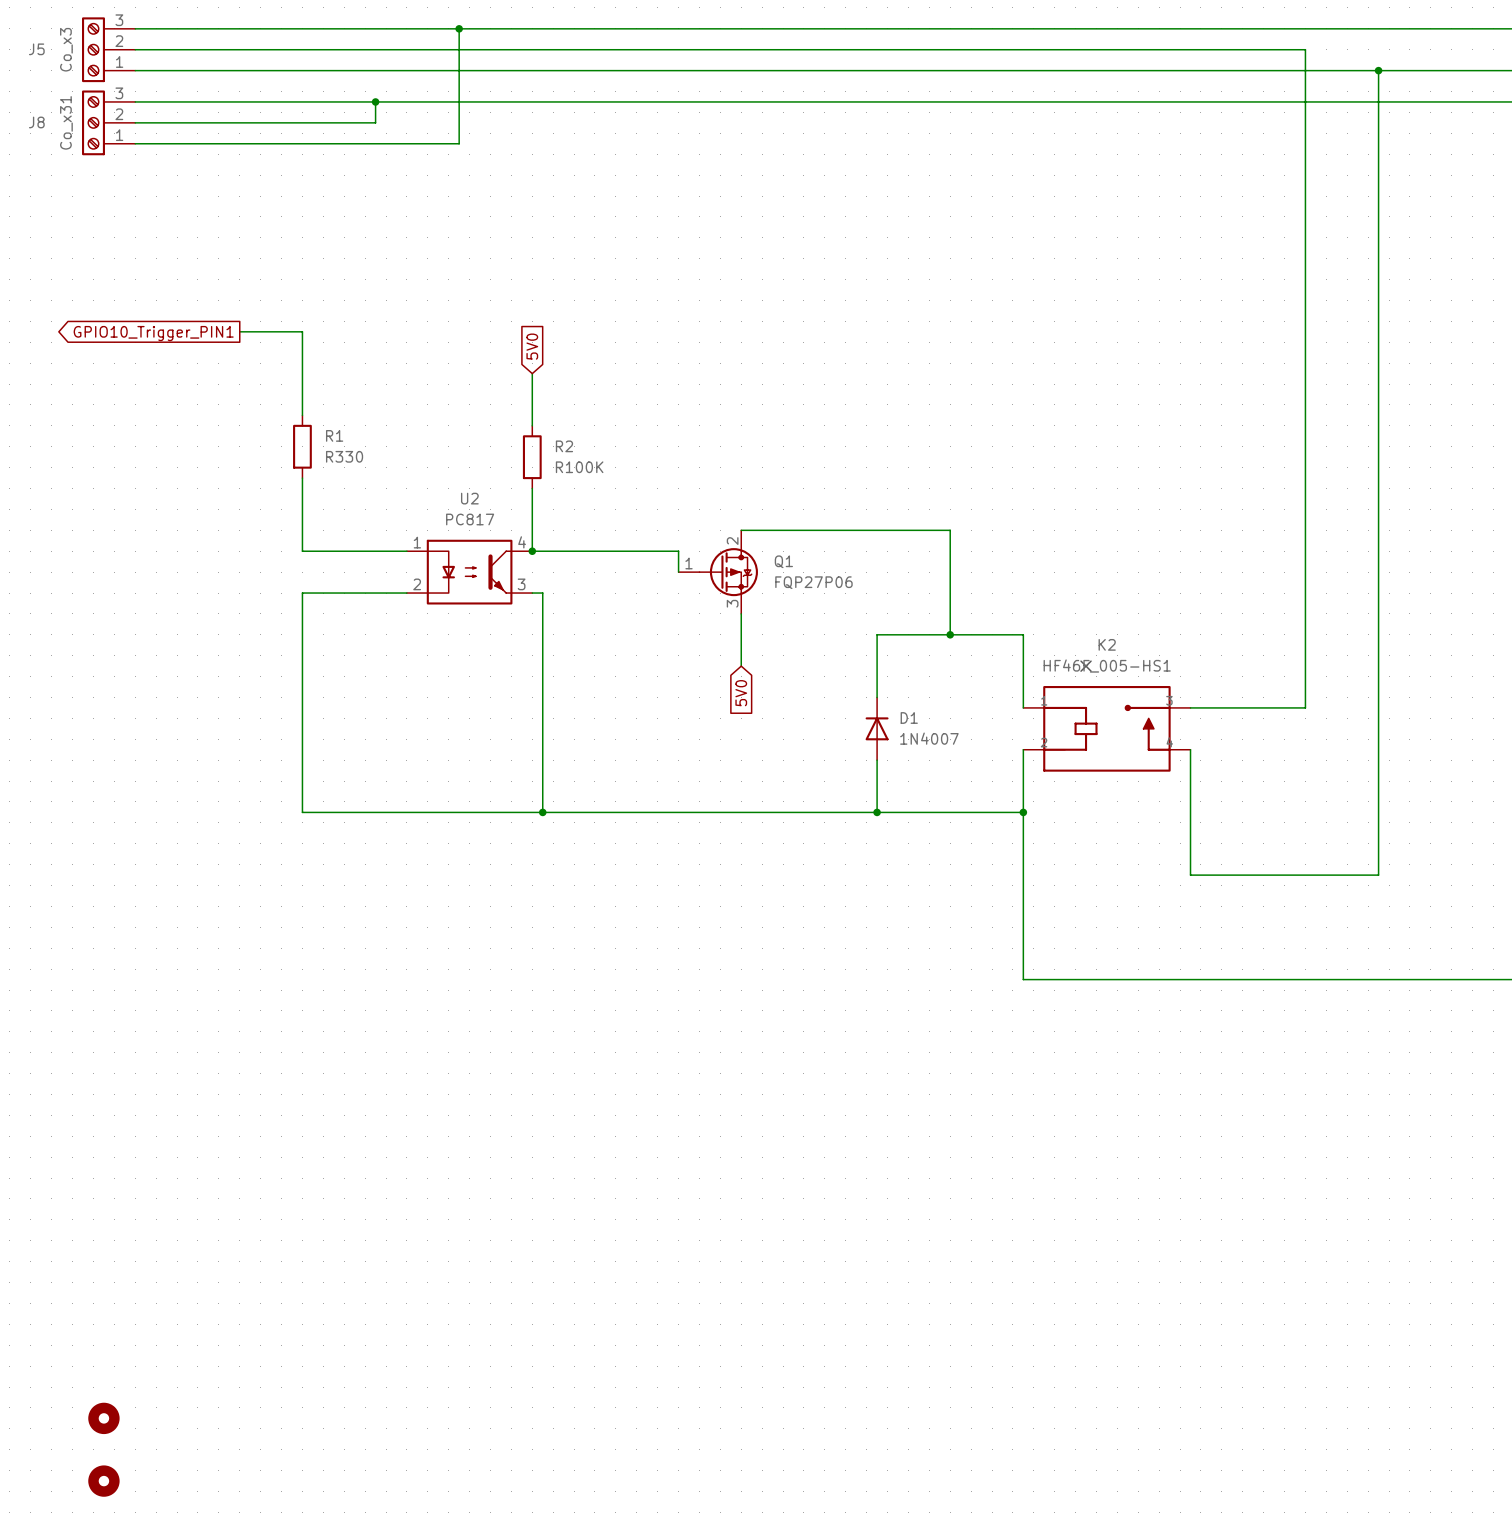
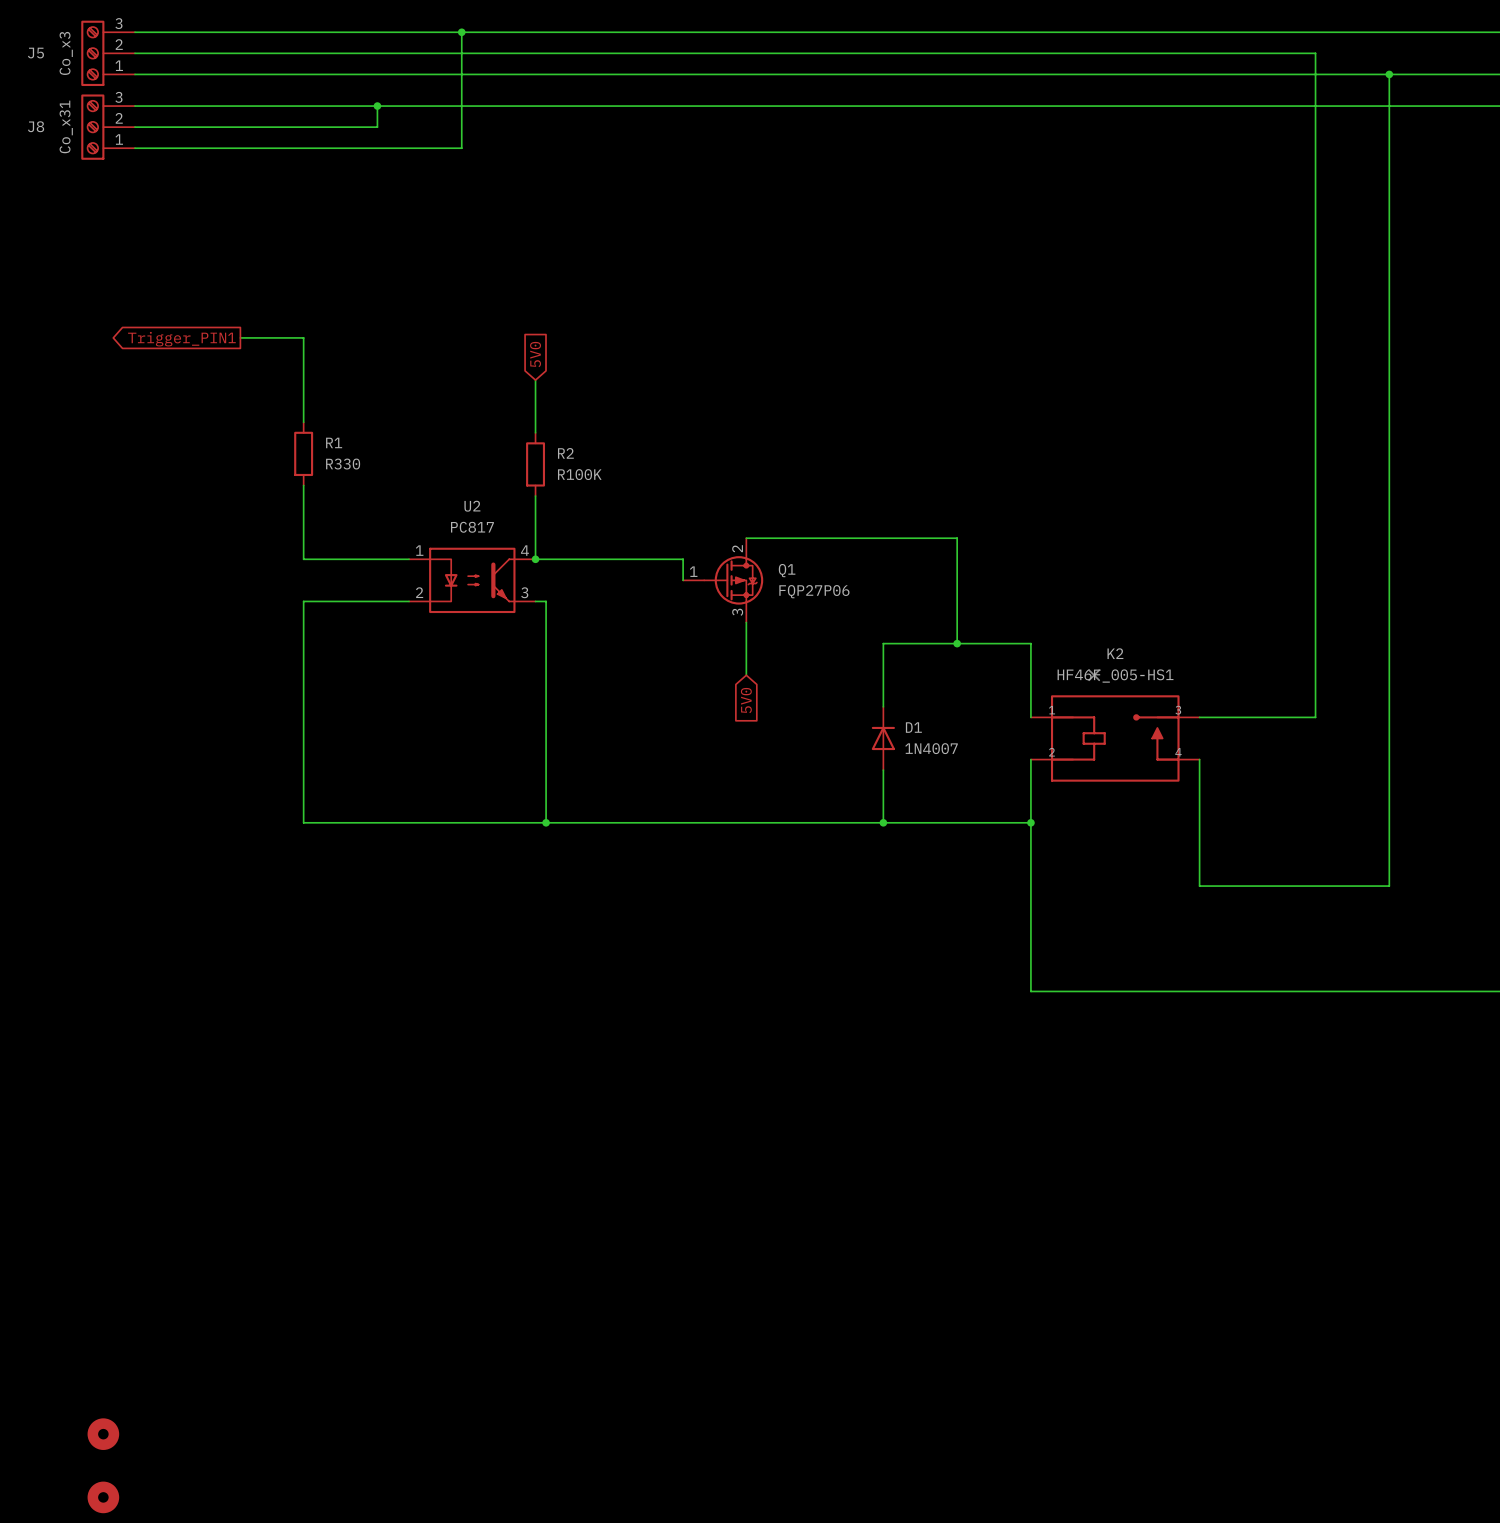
global label: GPIO10_Trigger_PIN1 (153, 333) -> Trigger_PIN1 (181, 339)

